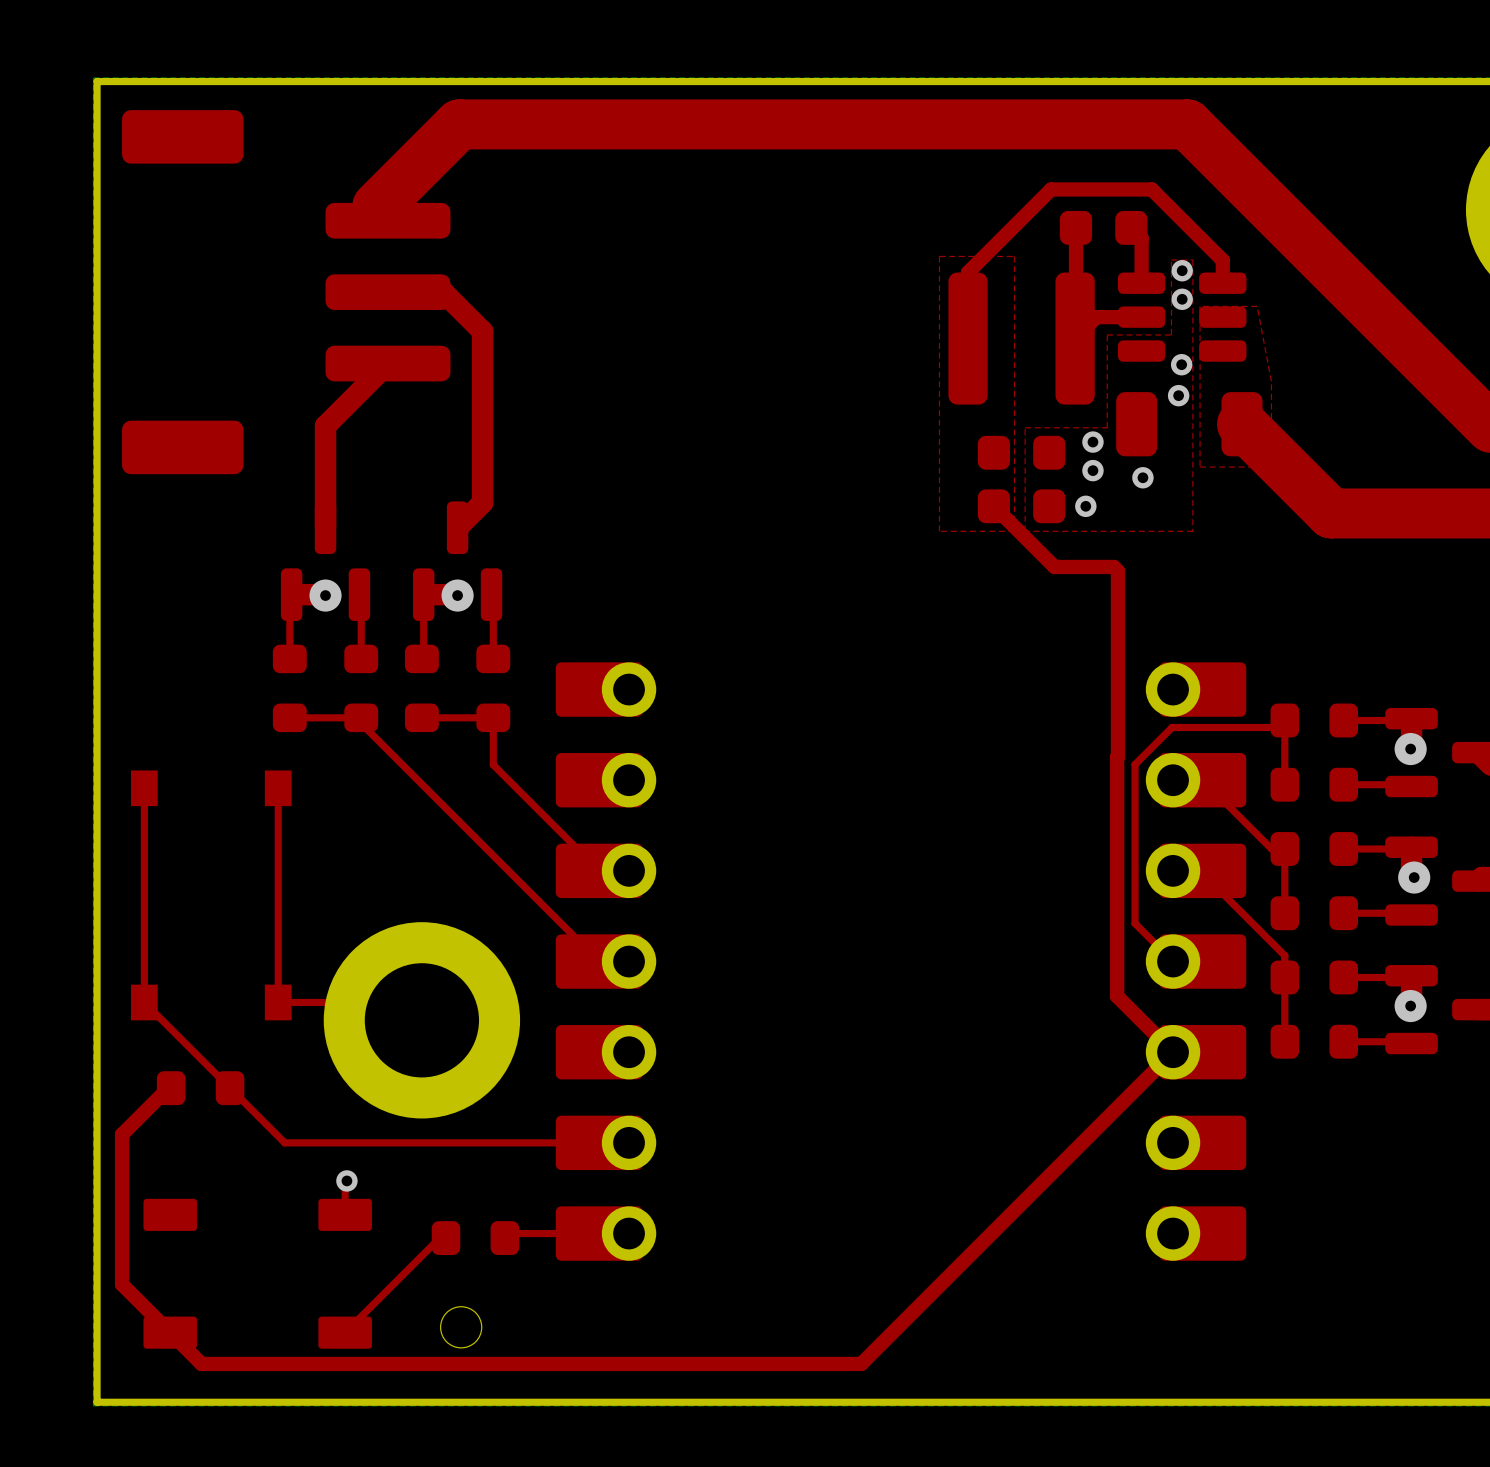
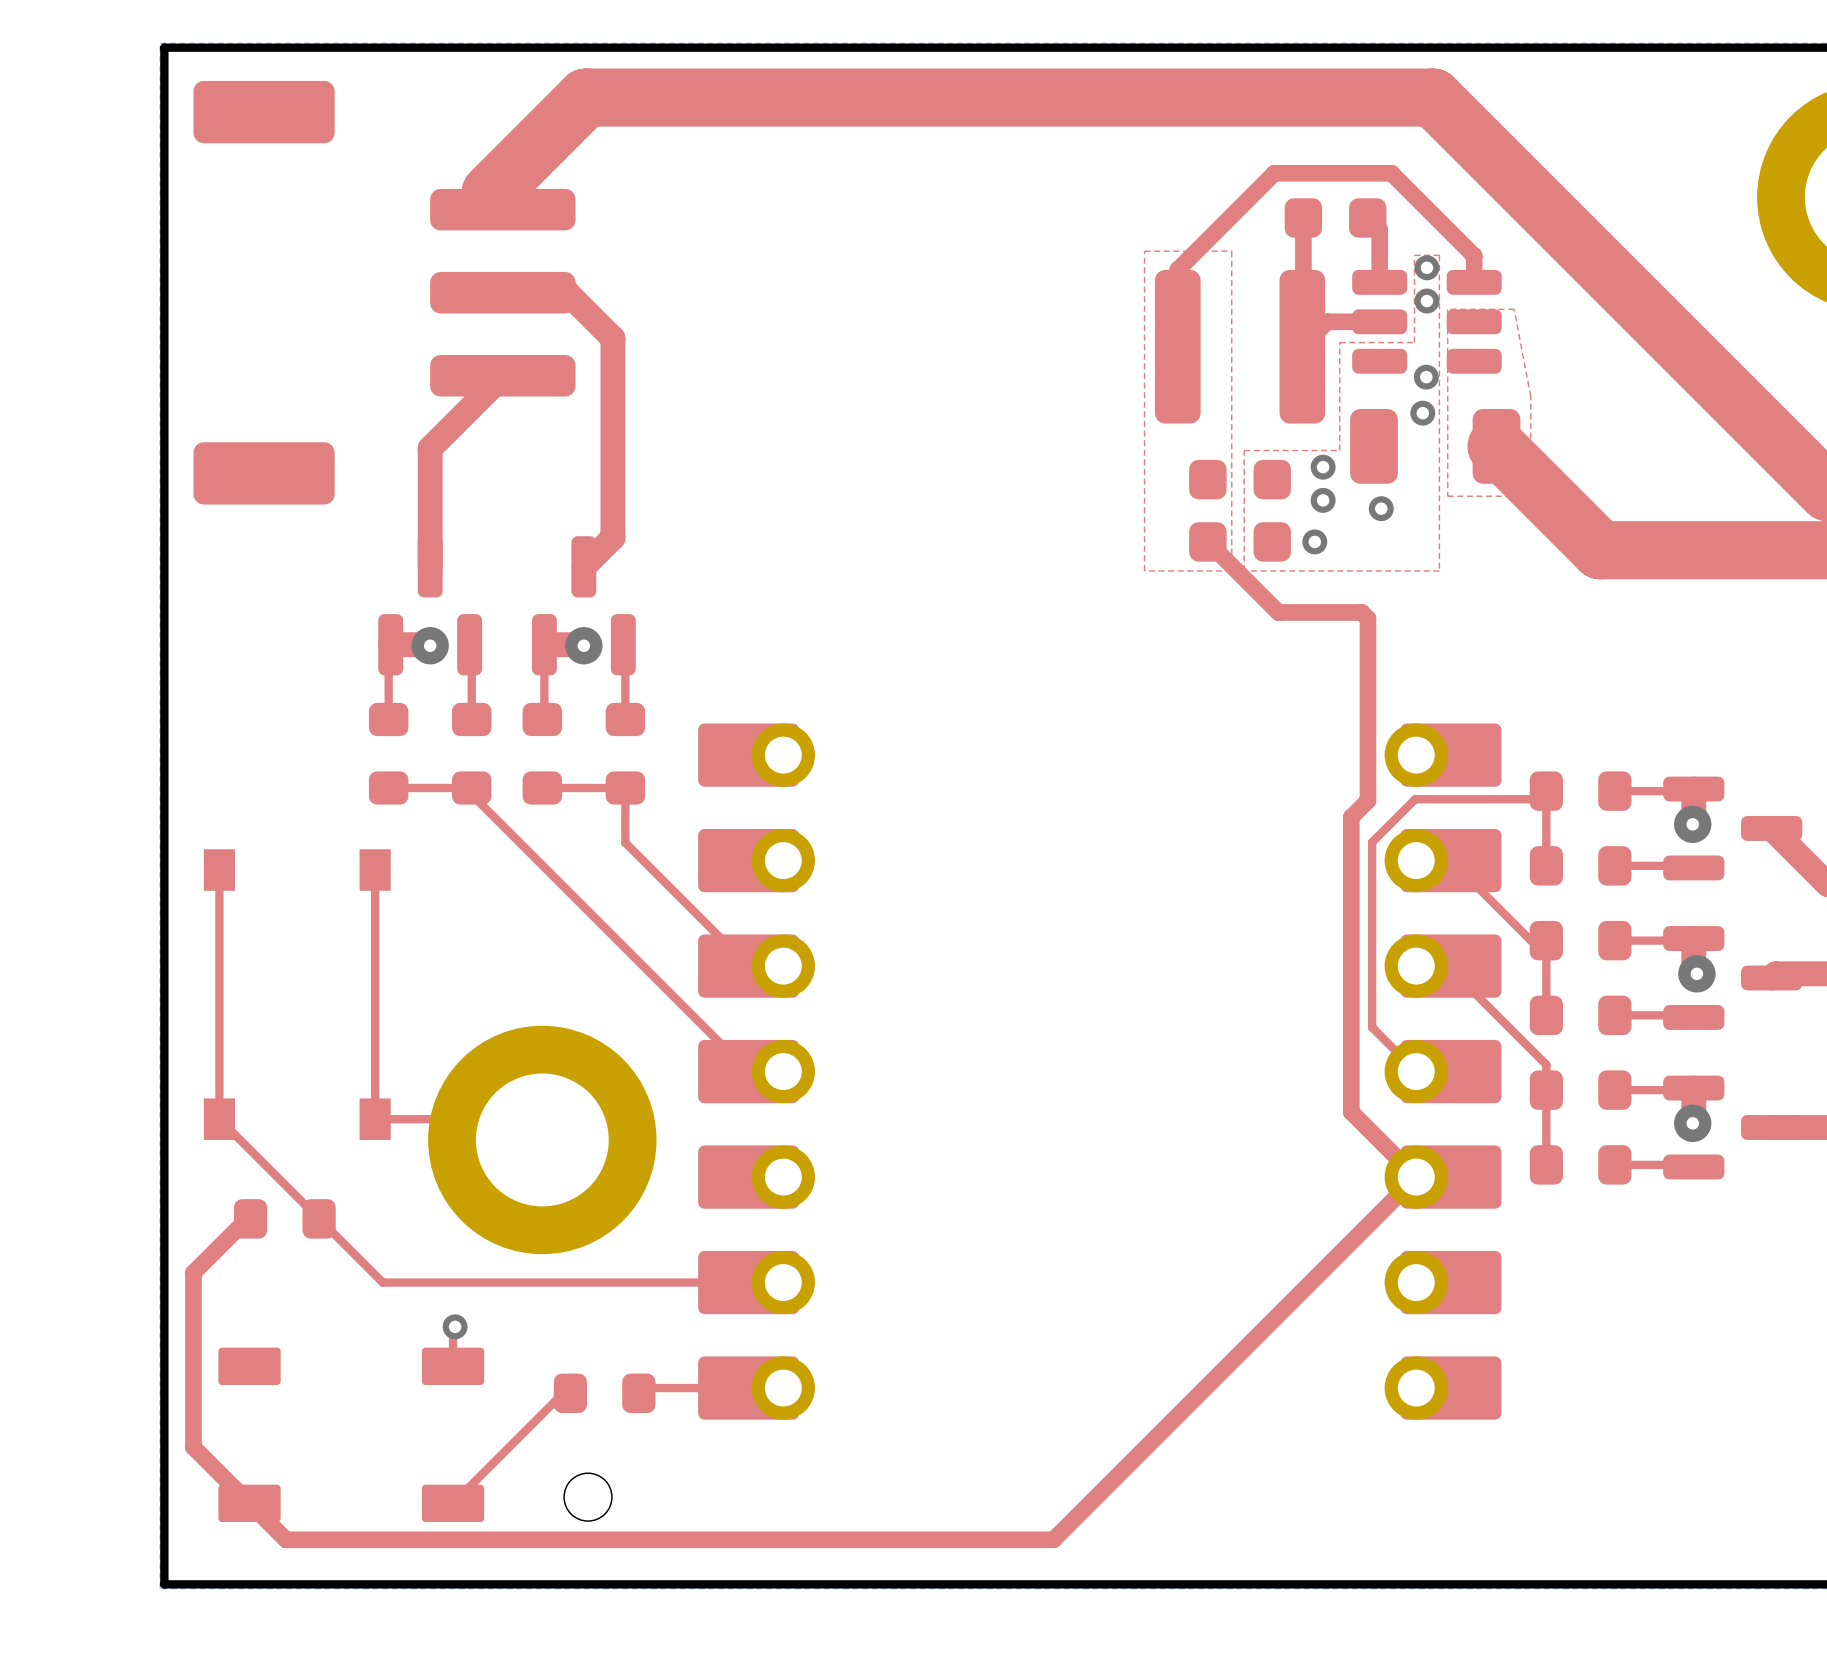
top track: (1113, 566) (1117, 571) (1117, 757) -> (1347, 612) (1361, 612) (1367, 618) (1367, 800) (1351, 817) (1351, 833)

